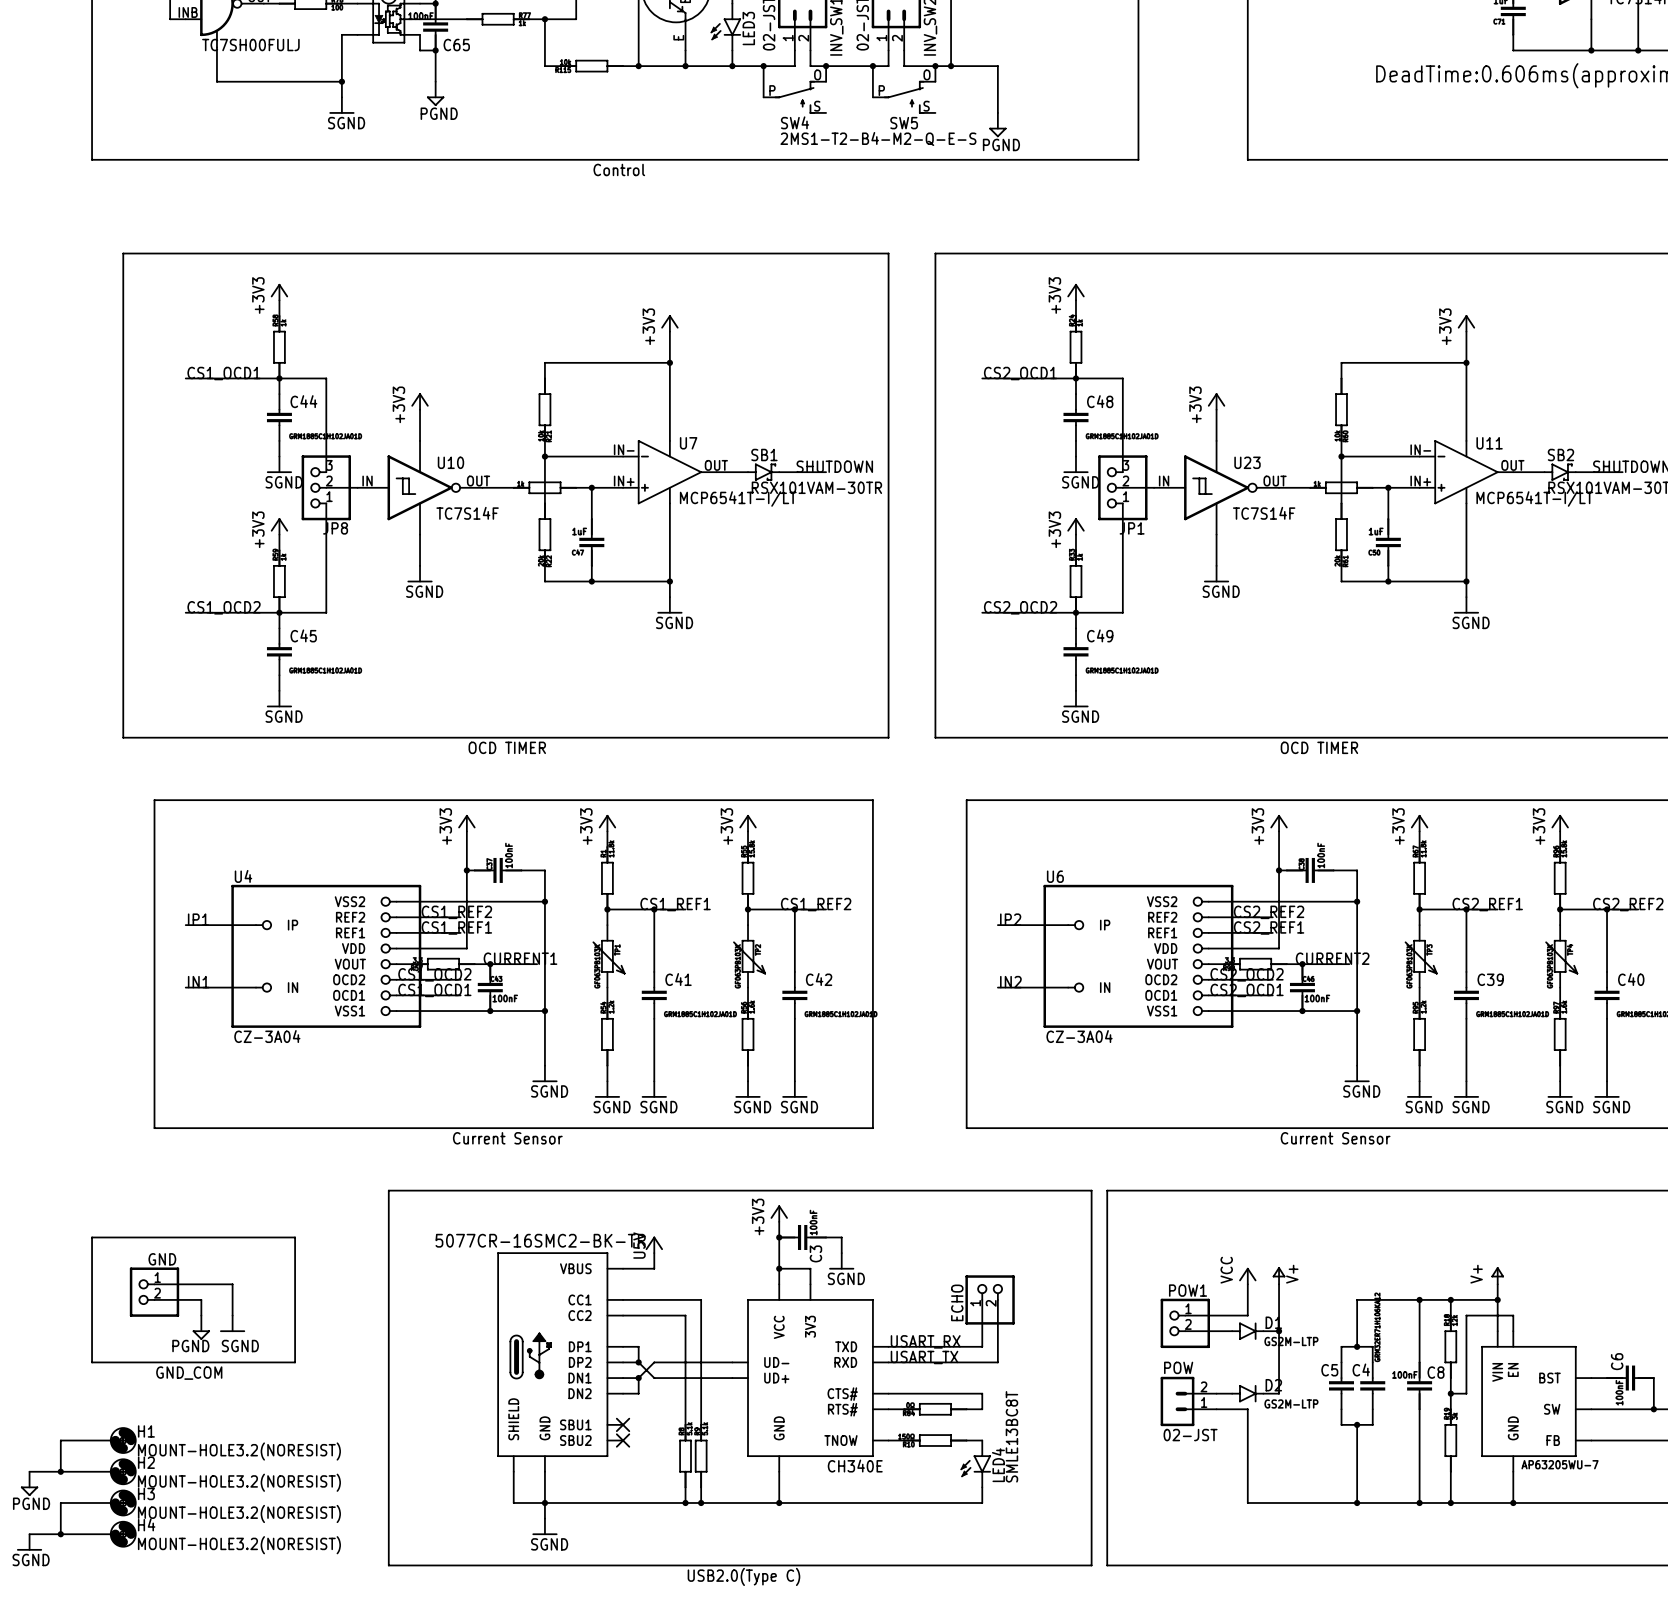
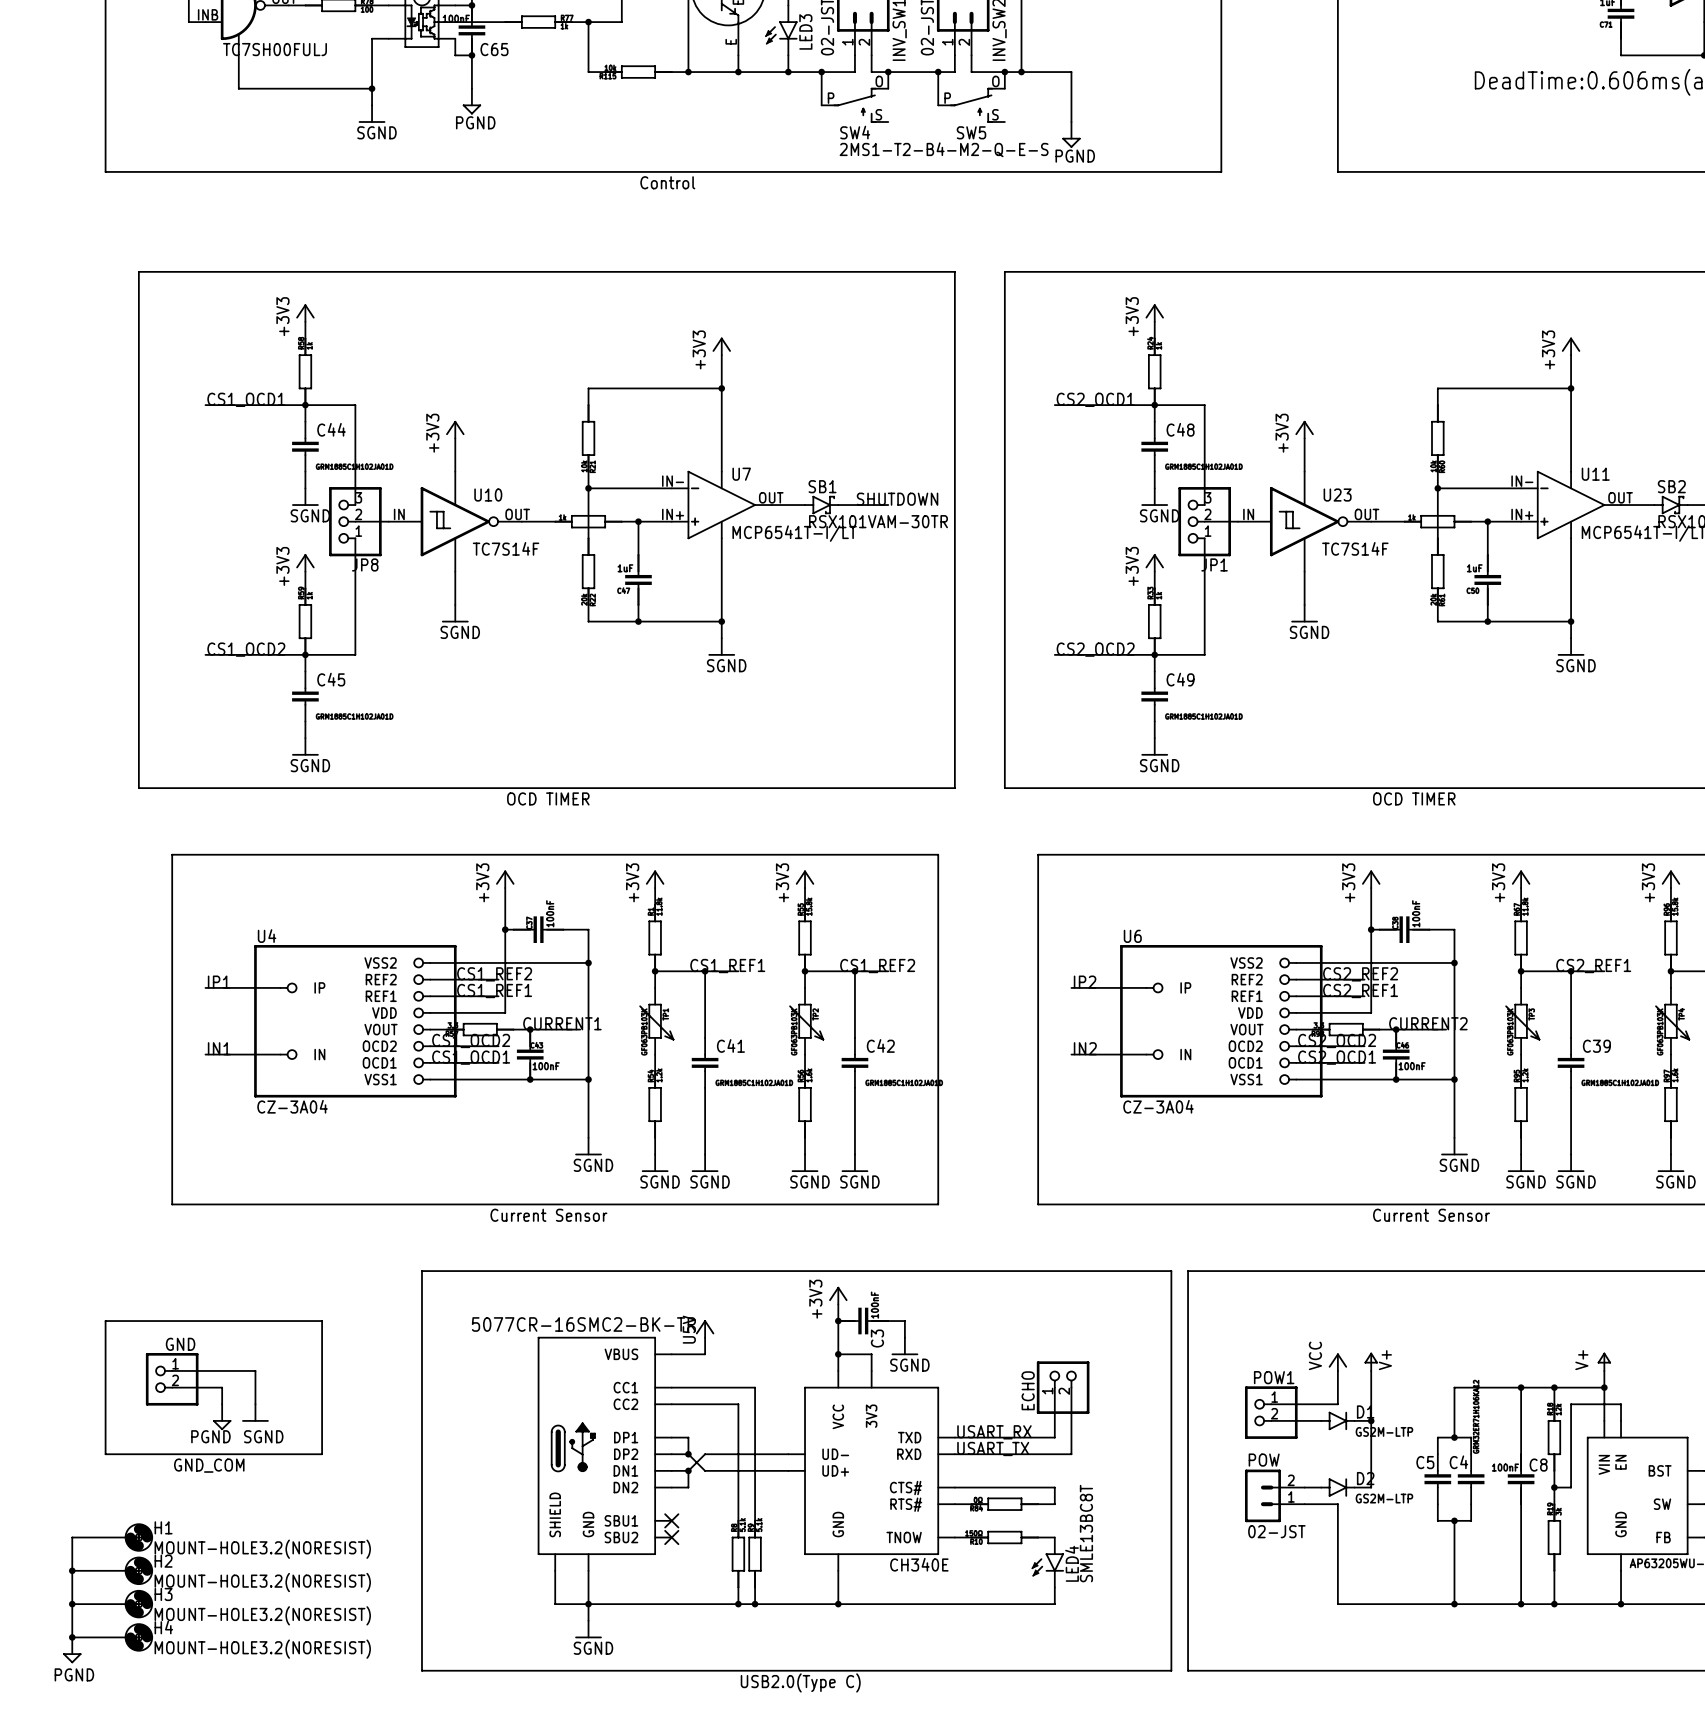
wire: (29, 1471) (60, 1471) -> (72, 1604) (72, 1570)
power symbol position: (29, 1483) -> (72, 1650)
junction: none -> (72, 1604)
label position: PGND (31, 1503) -> PGND (74, 1674)
wire: (29, 1534) (60, 1534) -> none
power symbol: (29, 1542) -> none
label: SGND (31, 1560) -> none

